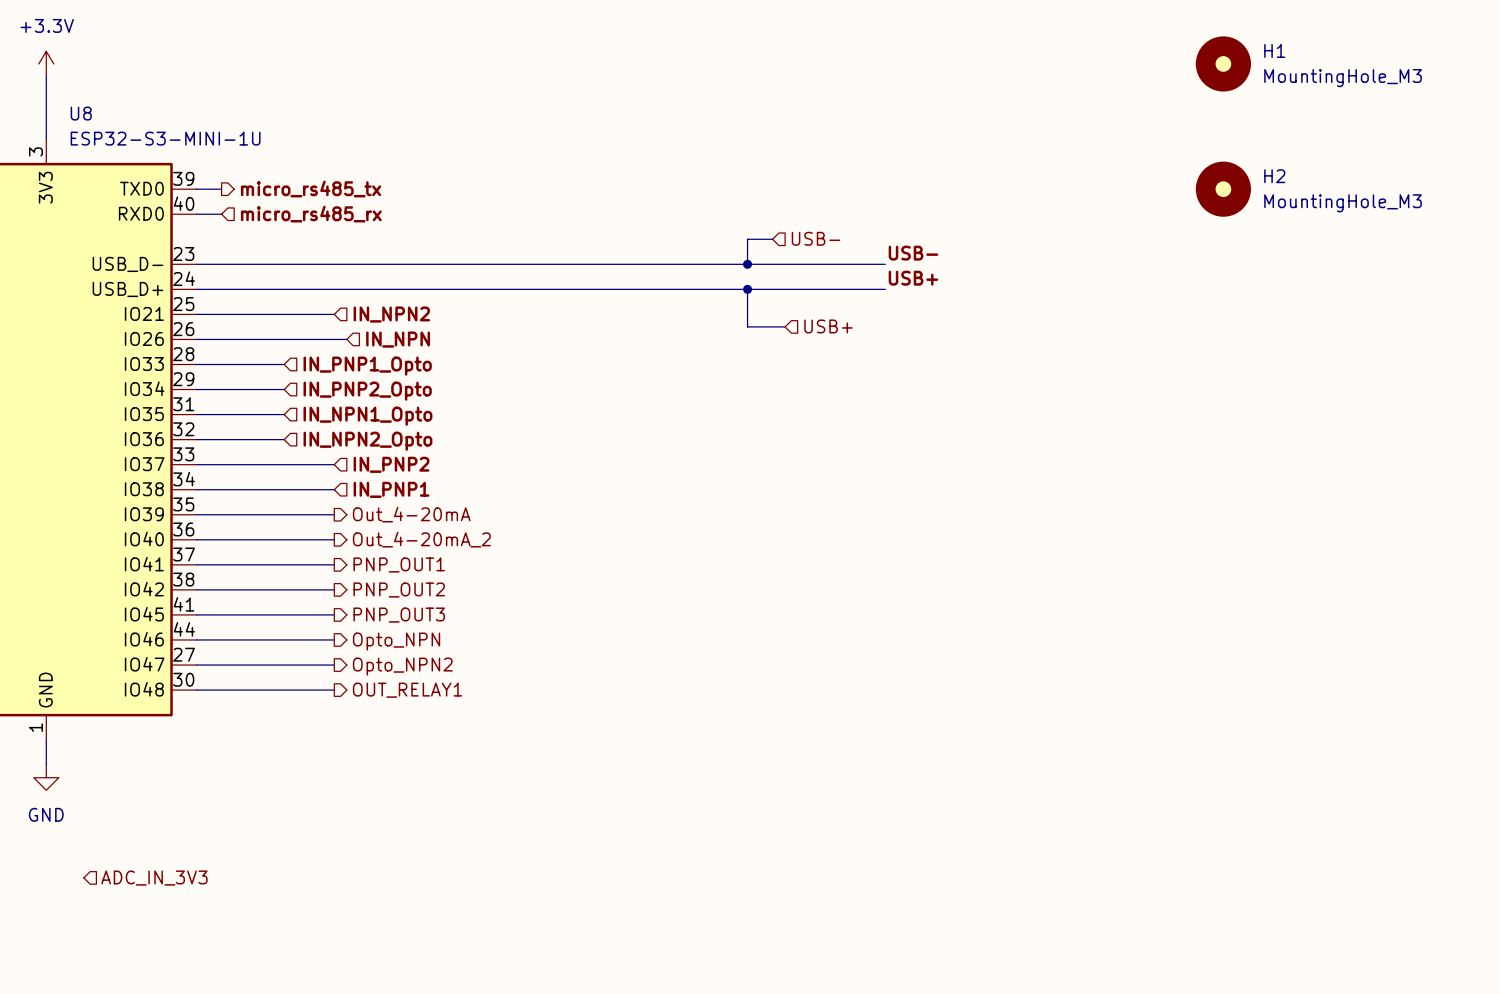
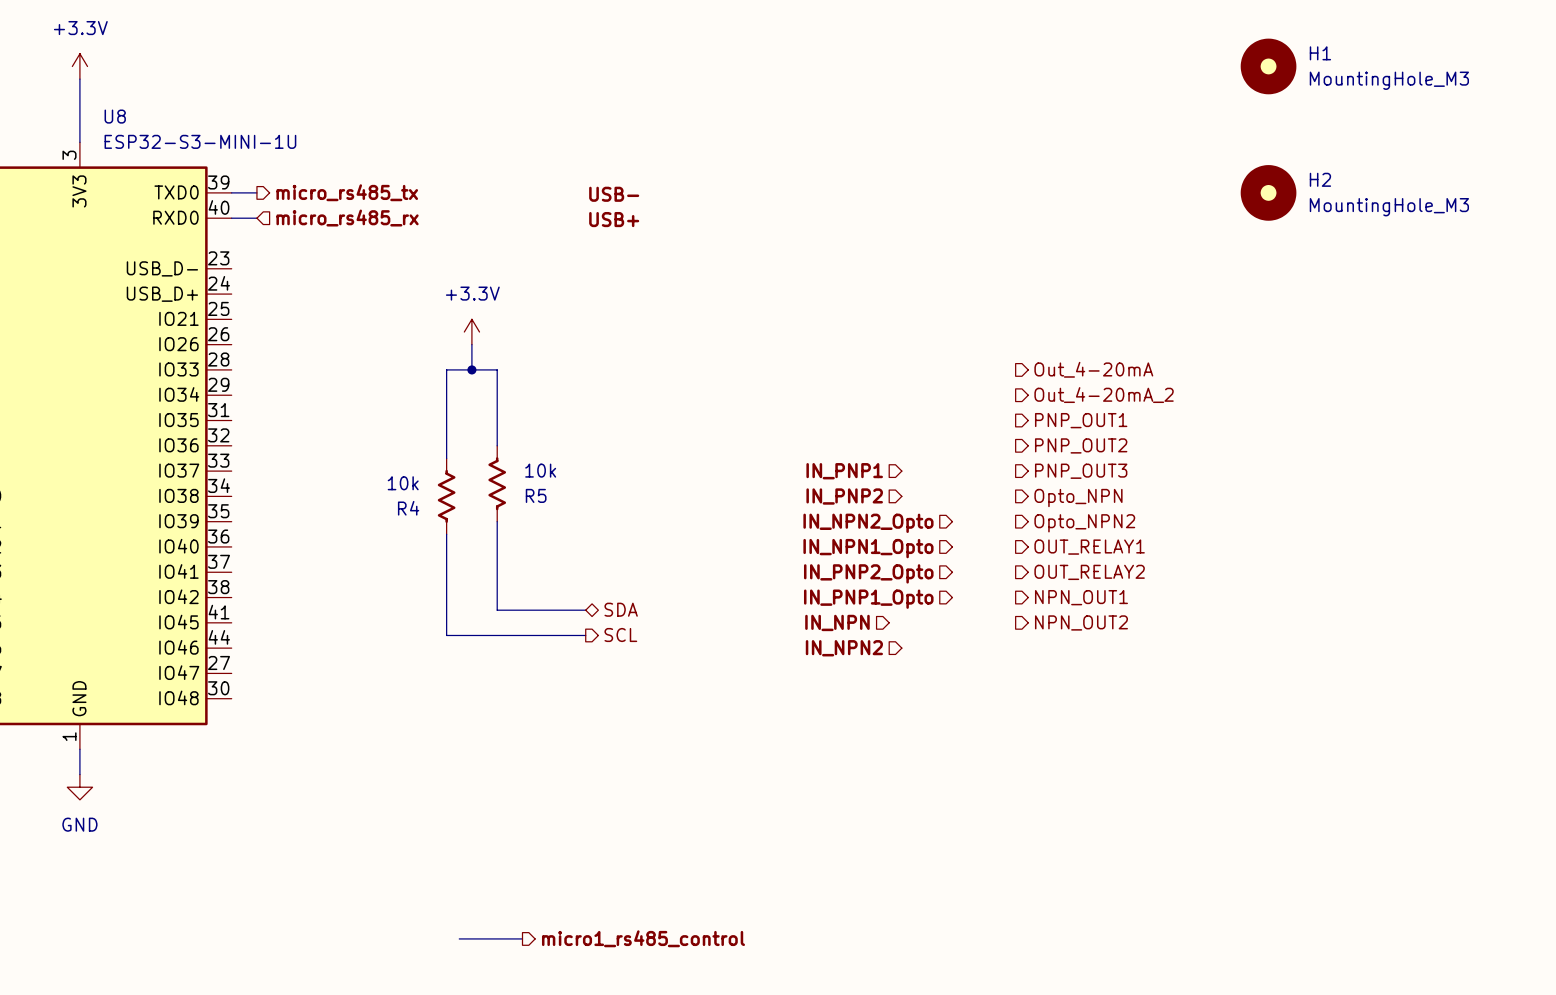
label: none -> USB- (614, 194)
label: none -> USB+ (614, 219)
hierarchical label: USB- (816, 238) -> none
wire: (772, 239) (747, 239) (747, 264) -> none
label: USB- (913, 253) -> none
wire: (196, 264) (885, 264) -> none
junction: (747, 264) -> none
label: USB+ (913, 278) -> none
wire: (196, 289) (885, 289) -> none
wire: (747, 289) (747, 326) (785, 326) -> none
junction: (747, 289) -> none
wire: (196, 314) (334, 314) -> none
hierarchical label: IN_NPN2 (391, 314) -> none
power symbol: none -> +3.3V (471, 332)
hierarchical label: USB+ (828, 326) -> none
wire: (196, 339) (346, 339) -> none
hierarchical label: IN_NPN (398, 339) -> none
wire: none -> (471, 344) (471, 369)
wire: (196, 364) (284, 364) -> none
junction: none -> (471, 369)
hierarchical label: none -> Out_4-20mA (1093, 369)
hierarchical label: IN_PNP1_Opto (367, 366) -> none
wire: (196, 389) (284, 389) -> none
hierarchical label: none -> Out_4-20mA_2 (1104, 395)
hierarchical label: IN_PNP2_Opto (367, 391) -> none
wire: (196, 414) (284, 414) -> none
hierarchical label: none -> PNP_OUT1 (1081, 420)
hierarchical label: IN_NPN1_Opto (367, 416) -> none
wire: (196, 439) (284, 439) -> none
wire: none -> (497, 445) (497, 369) (446, 369) (446, 458)
hierarchical label: none -> PNP_OUT2 (1081, 445)
hierarchical label: IN_NPN2_Opto (367, 441) -> none
wire: (196, 464) (334, 464) -> none
hierarchical label: IN_PNP2 (391, 464) -> none
hierarchical label: none -> IN_PNP1 (844, 471)
hierarchical label: none -> PNP_OUT3 (1081, 471)
R5: none -> 10k (497, 483)
wire: (196, 489) (334, 489) -> none
hierarchical label: IN_PNP1 (391, 489) -> none
R4: none -> 10k (446, 496)
hierarchical label: none -> IN_PNP2 (844, 496)
hierarchical label: none -> Opto_NPN (1078, 498)
wire: (196, 514) (334, 514) -> none
hierarchical label: Out_4-20mA (411, 514) -> none
wire: none -> (497, 521) (497, 610) (585, 610)
hierarchical label: none -> IN_NPN2_Opto (868, 523)
hierarchical label: none -> Opto_NPN2 (1084, 523)
wire: none -> (446, 534) (446, 635) (585, 635)
wire: (196, 539) (334, 539) -> none
hierarchical label: Out_4-20mA_2 (421, 539) -> none
hierarchical label: none -> OUT_RELAY1 (1089, 547)
hierarchical label: none -> IN_NPN1_Opto (868, 548)
wire: (196, 564) (334, 564) -> none
hierarchical label: PNP_OUT1 (399, 564) -> none
hierarchical label: none -> OUT_RELAY2 (1089, 572)
hierarchical label: none -> IN_PNP2_Opto (868, 573)
wire: (196, 589) (334, 589) -> none
hierarchical label: PNP_OUT2 (399, 590) -> none
hierarchical label: none -> NPN_OUT1 (1081, 597)
hierarchical label: none -> IN_PNP1_Opto (868, 599)
hierarchical label: none -> SDA (621, 609)
wire: (196, 614) (334, 614) -> none
hierarchical label: PNP_OUT3 (399, 615) -> none
hierarchical label: none -> IN_NPN (837, 622)
hierarchical label: none -> NPN_OUT2 (1081, 622)
hierarchical label: none -> SCL (620, 635)
wire: (196, 639) (334, 639) -> none
hierarchical label: none -> IN_NPN2 (844, 648)
hierarchical label: Opto_NPN (396, 641) -> none
wire: (196, 665) (334, 665) -> none
hierarchical label: Opto_NPN2 (402, 666) -> none
wire: (196, 690) (334, 690) -> none
hierarchical label: OUT_RELAY1 (407, 690) -> none
hierarchical label: ADC_IN_3V3 (154, 878) -> none
wire: none -> (459, 938) (522, 938)
hierarchical label: none -> micro1_rs485_control (643, 938)

